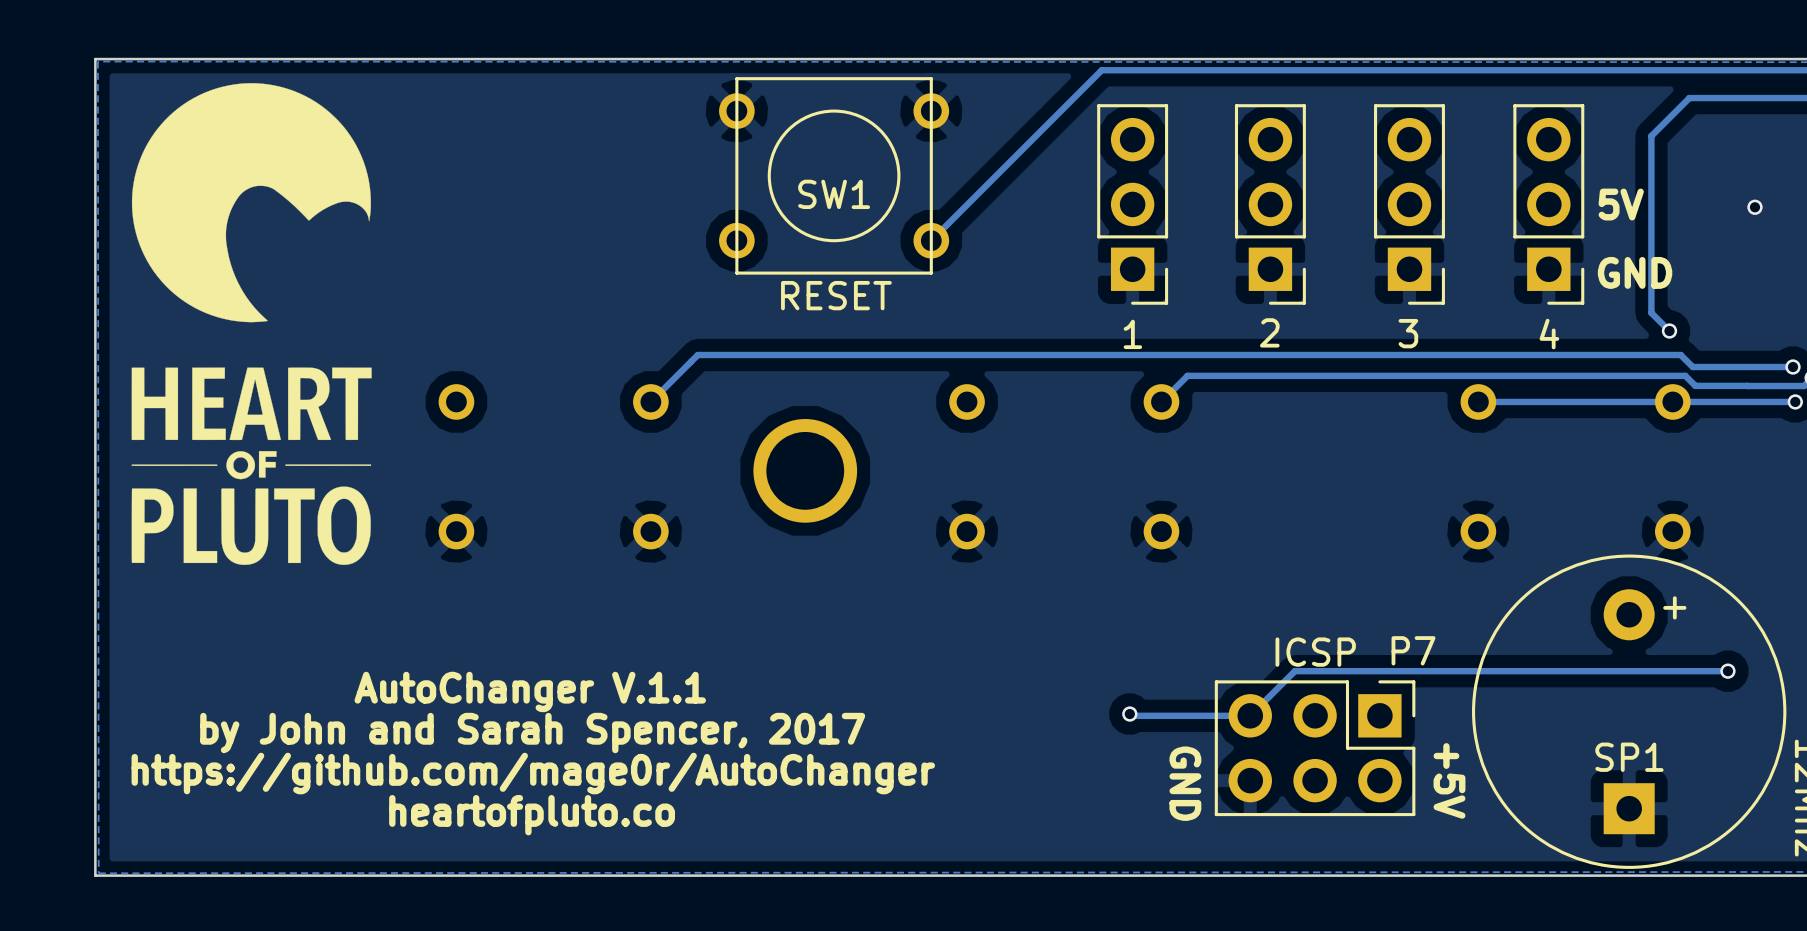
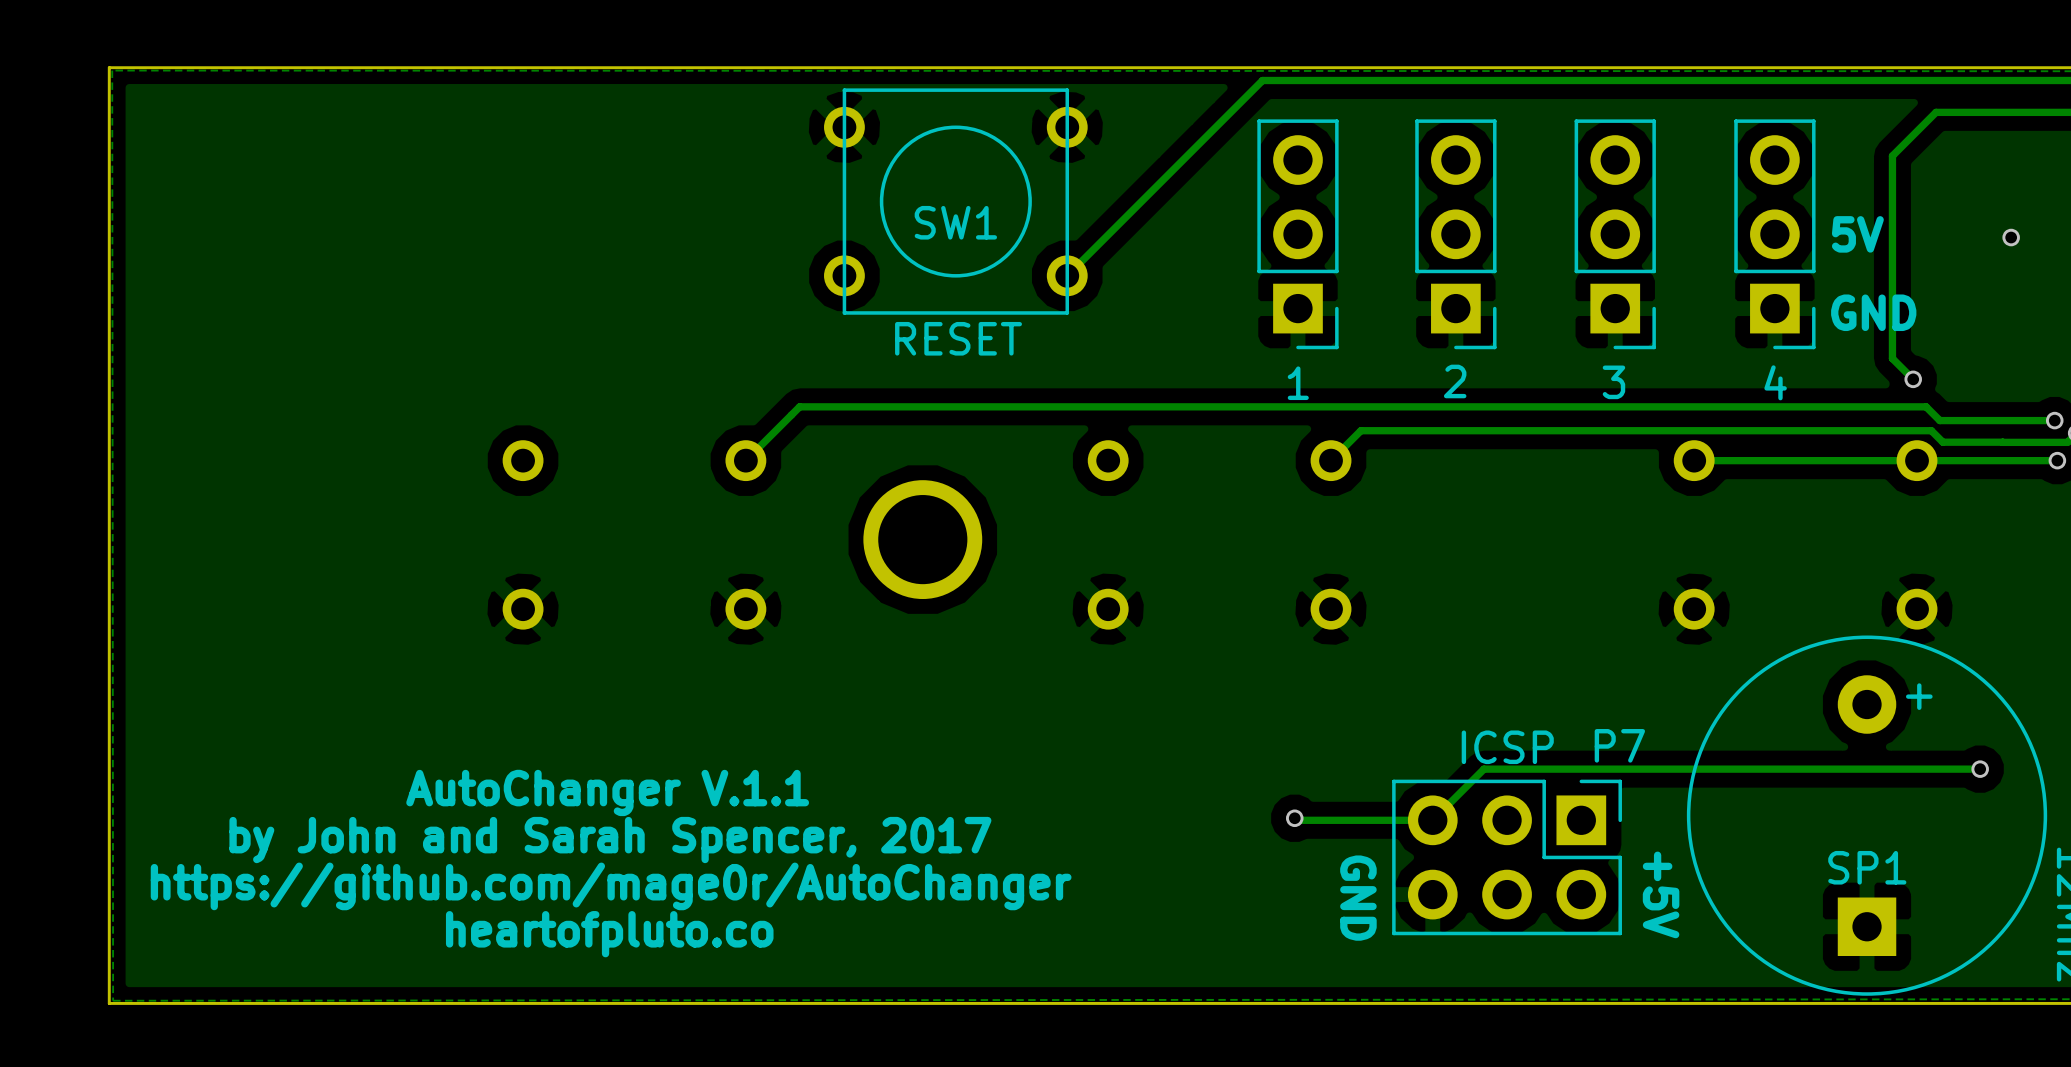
drawing: [131, 83, 372, 565] -> none

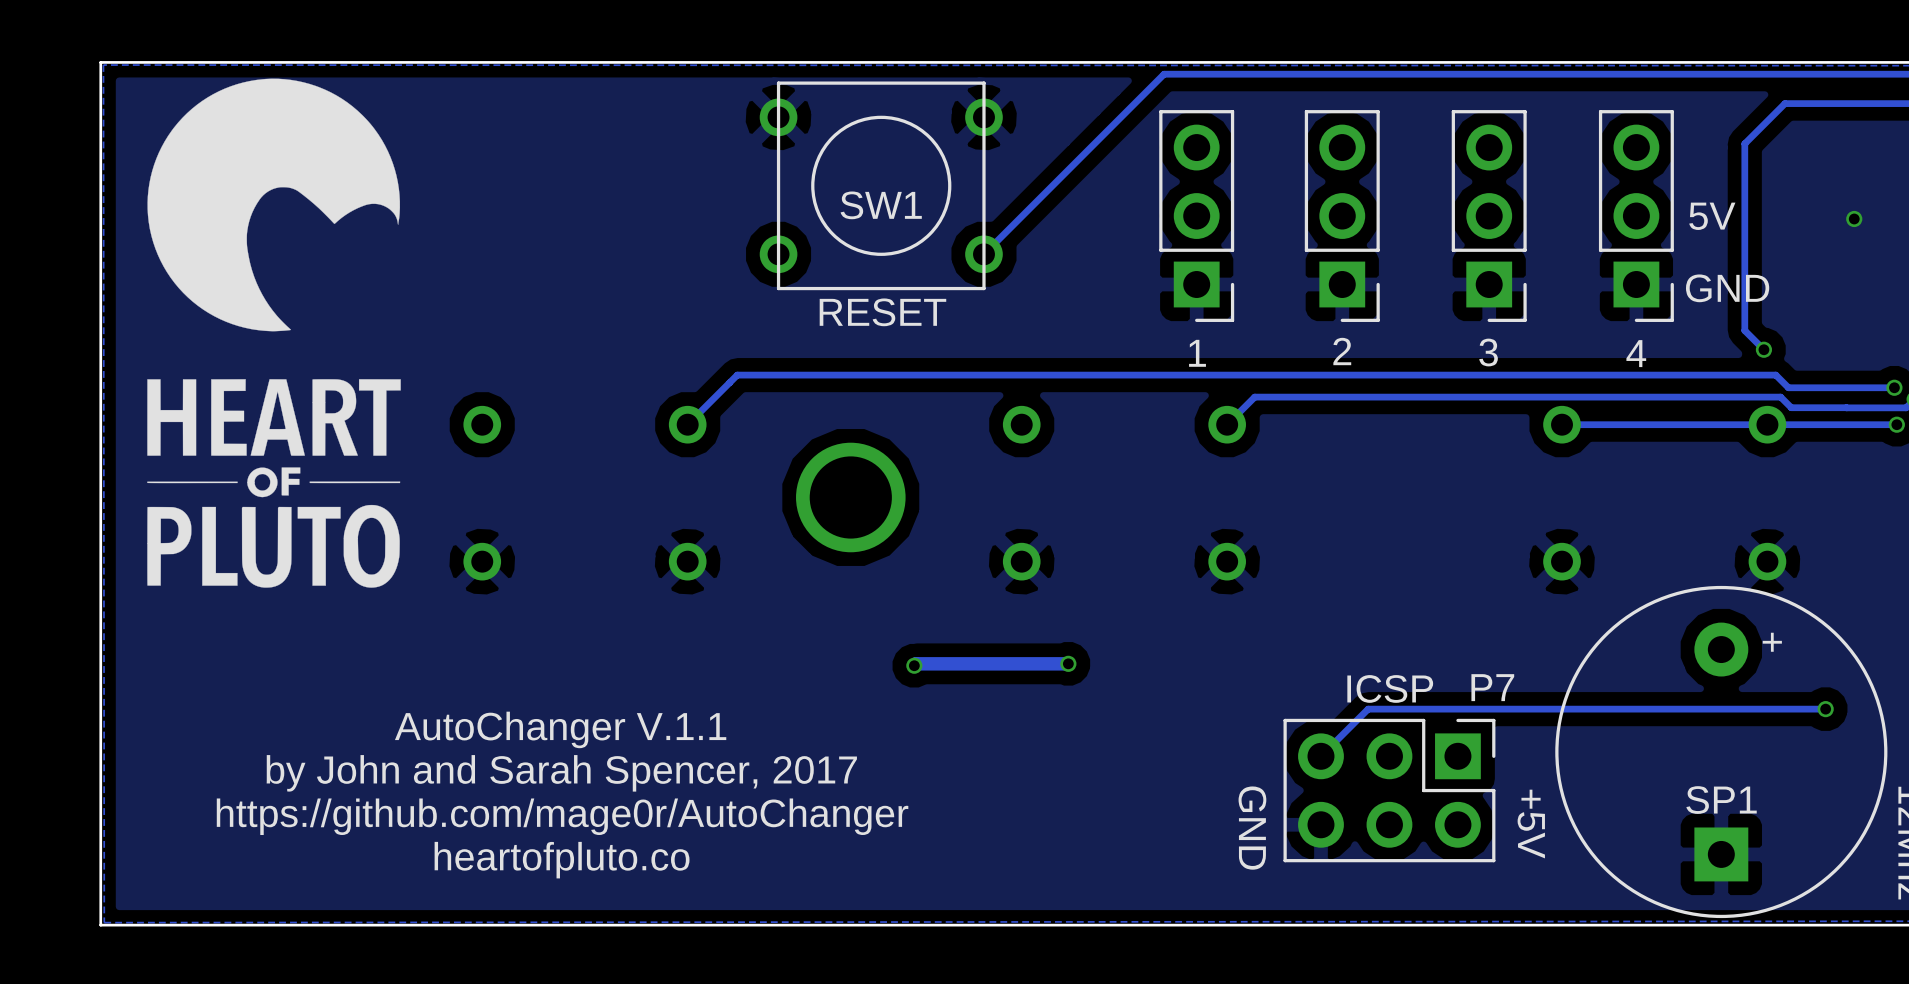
drawing: none -> [147, 78, 401, 588]
track: none -> (1068, 663) (916, 663) (914, 665)
via: none -> (1068, 663)
via: none -> (914, 665)
track: (1294, 818) (1296, 820) (1432, 820) -> none
via: (1294, 818) -> none

